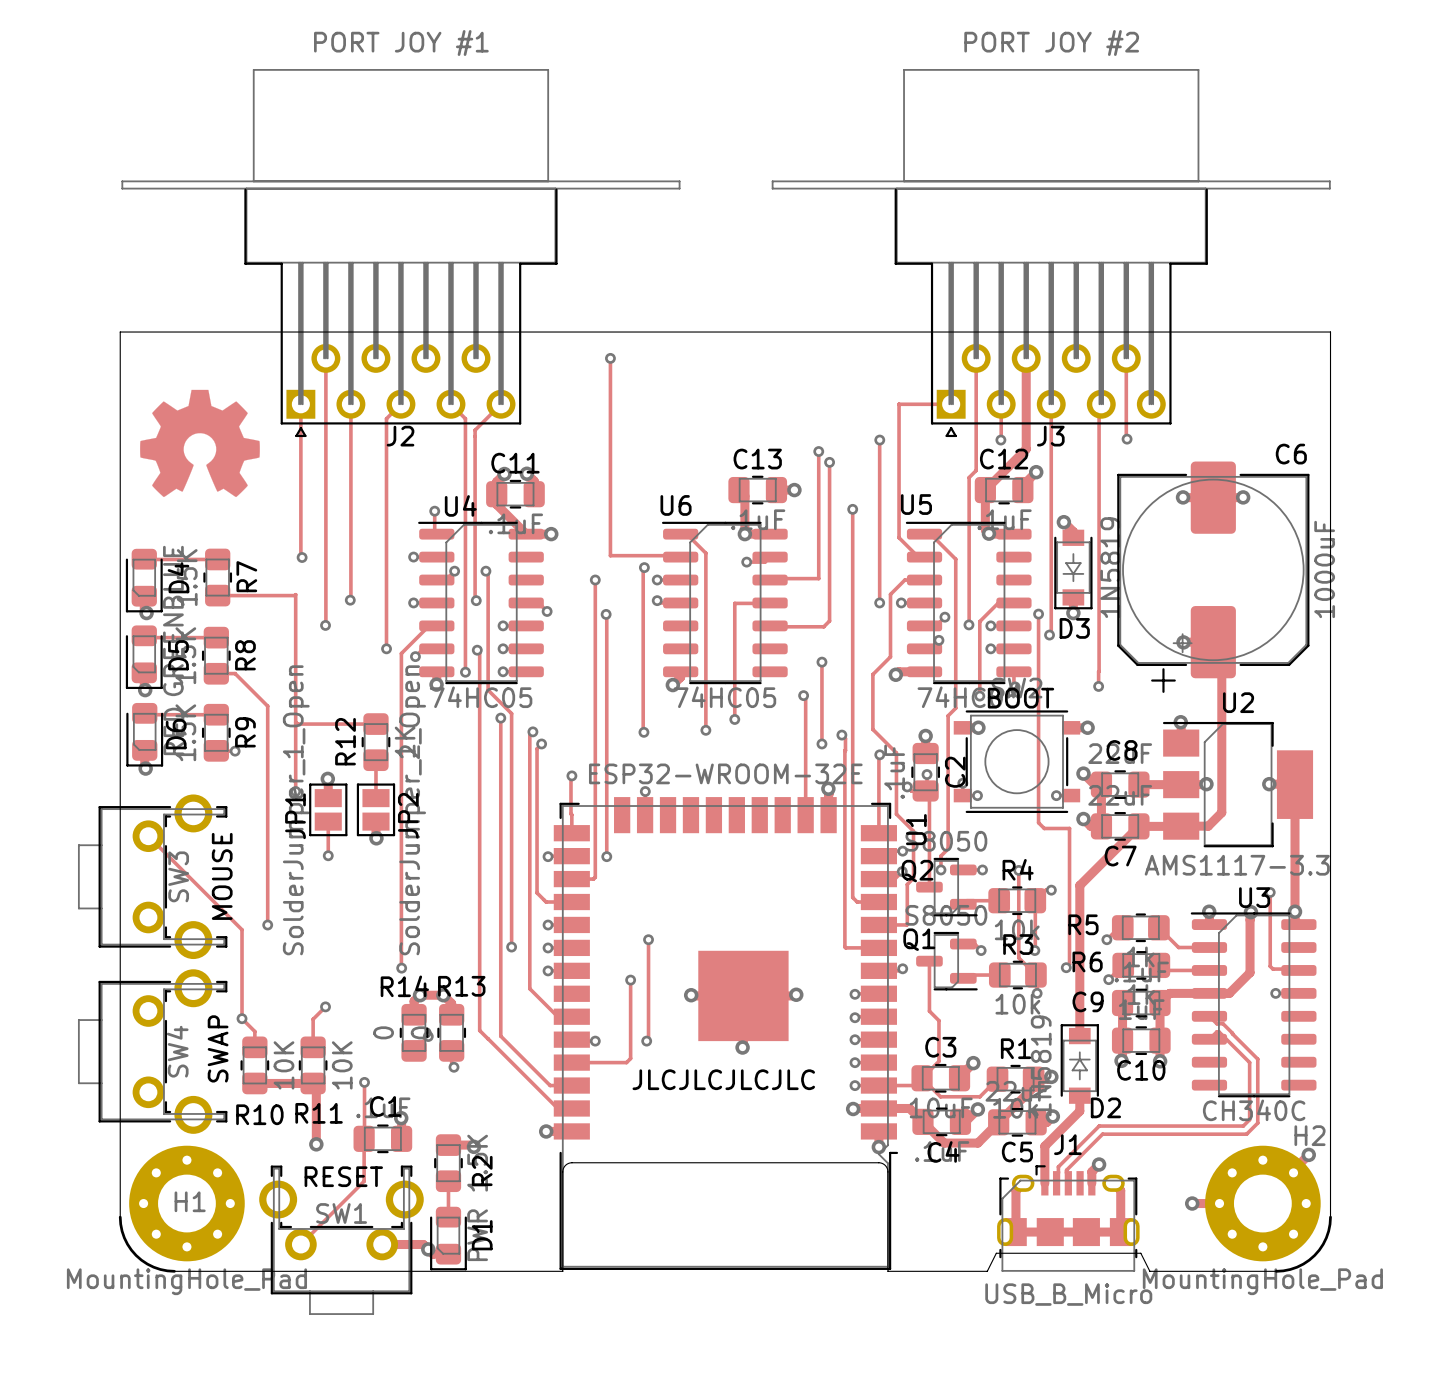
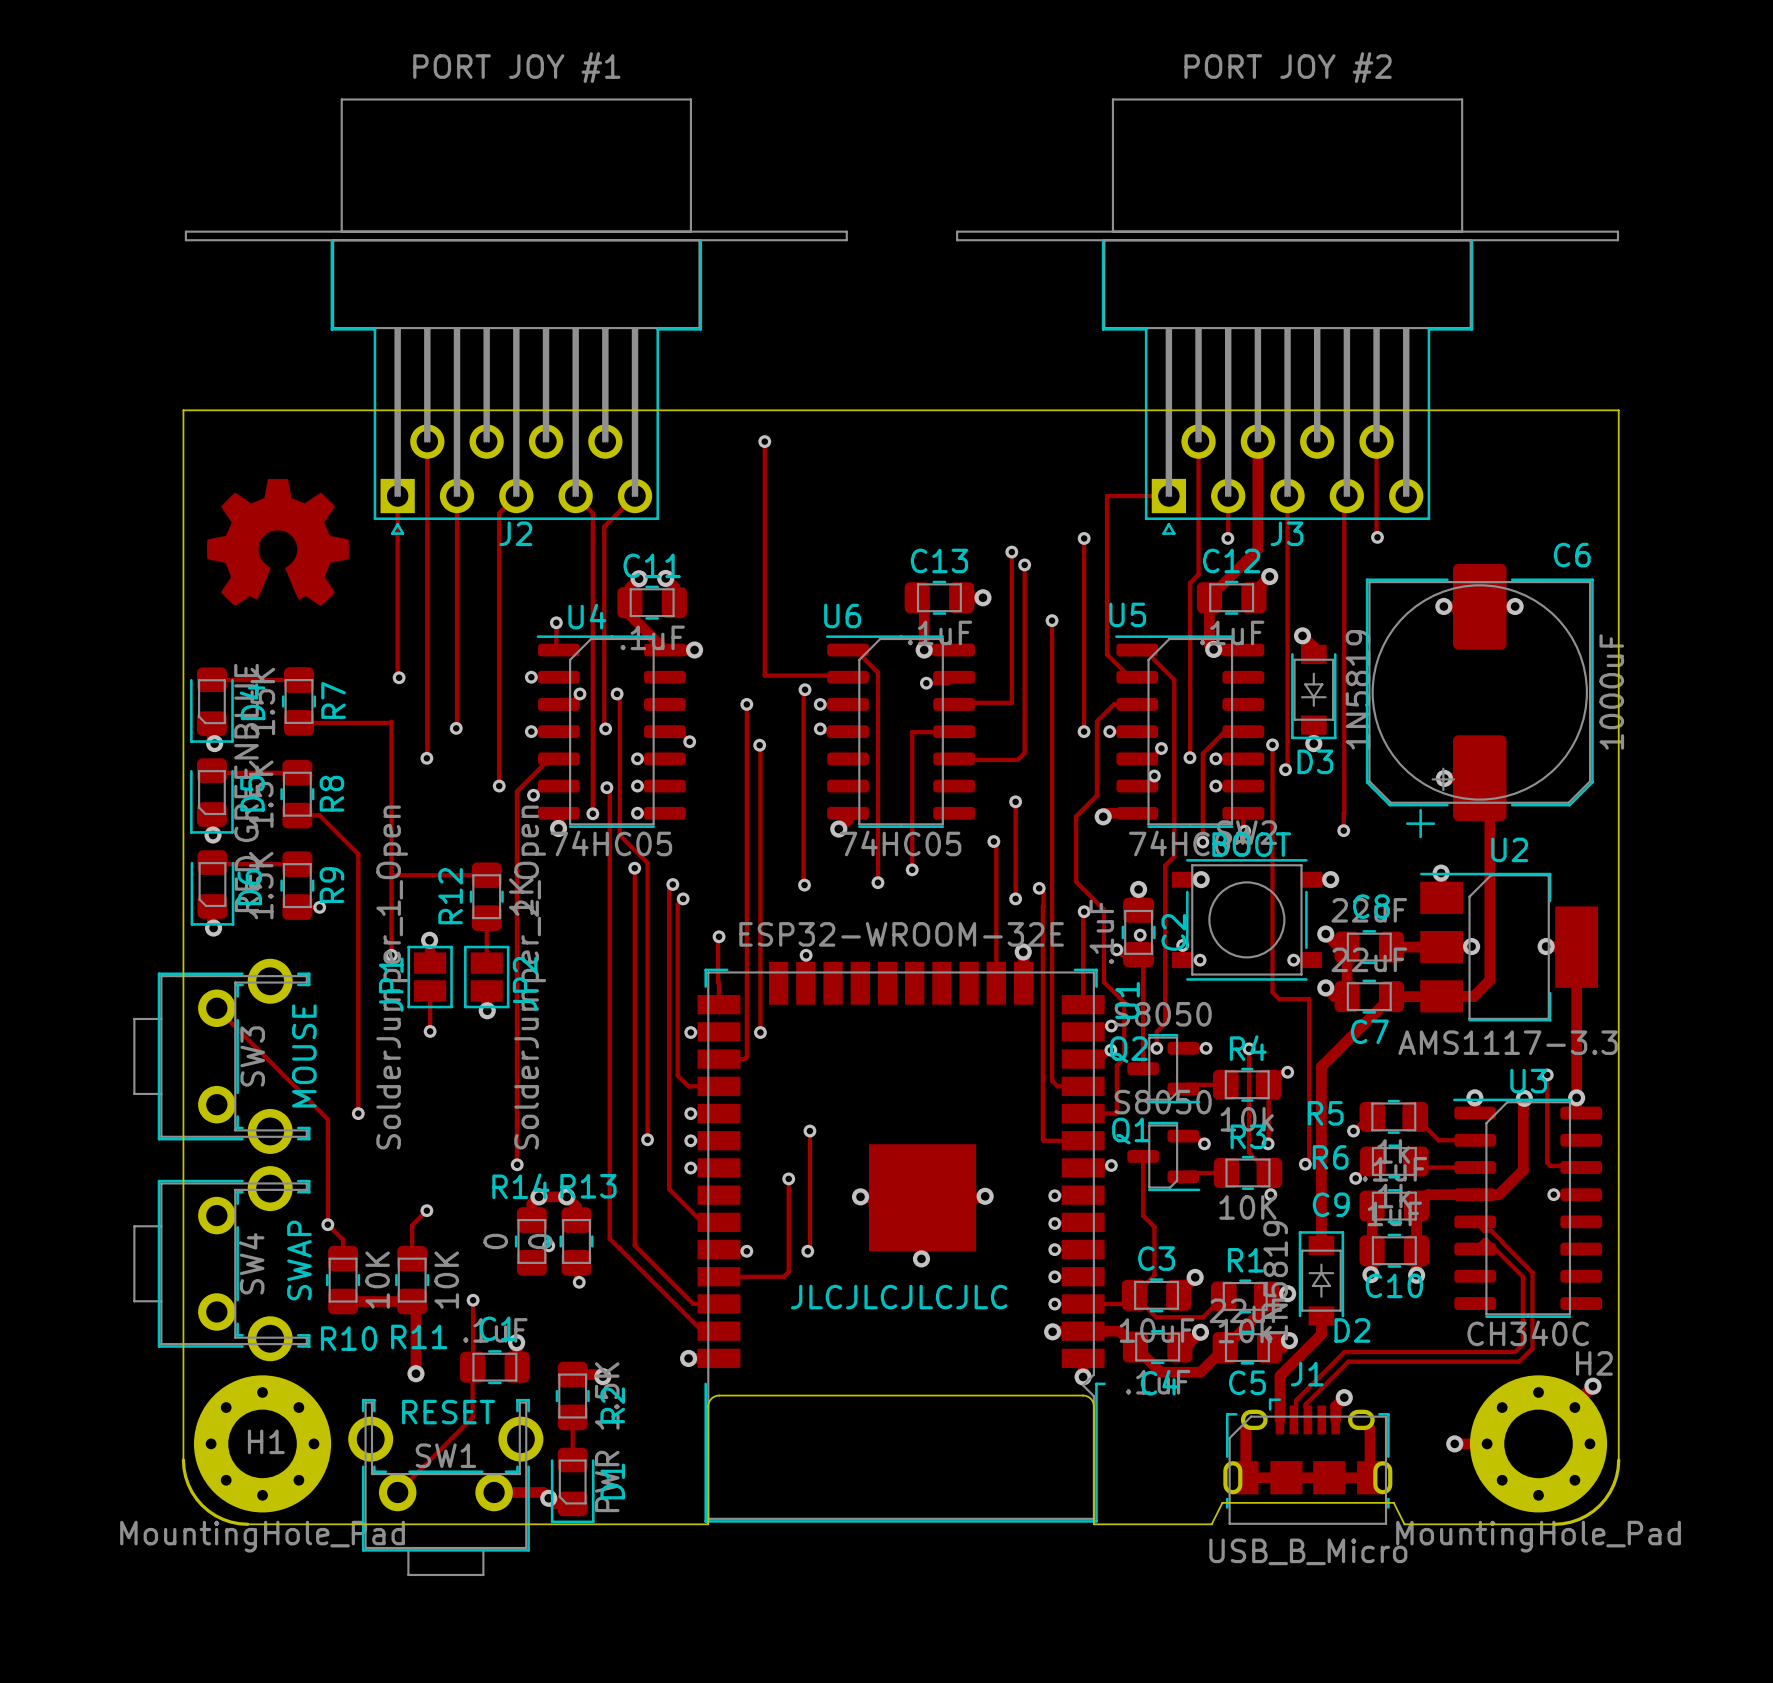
R3 value: 10k (1017, 1004) -> 10K (1247, 1207)

